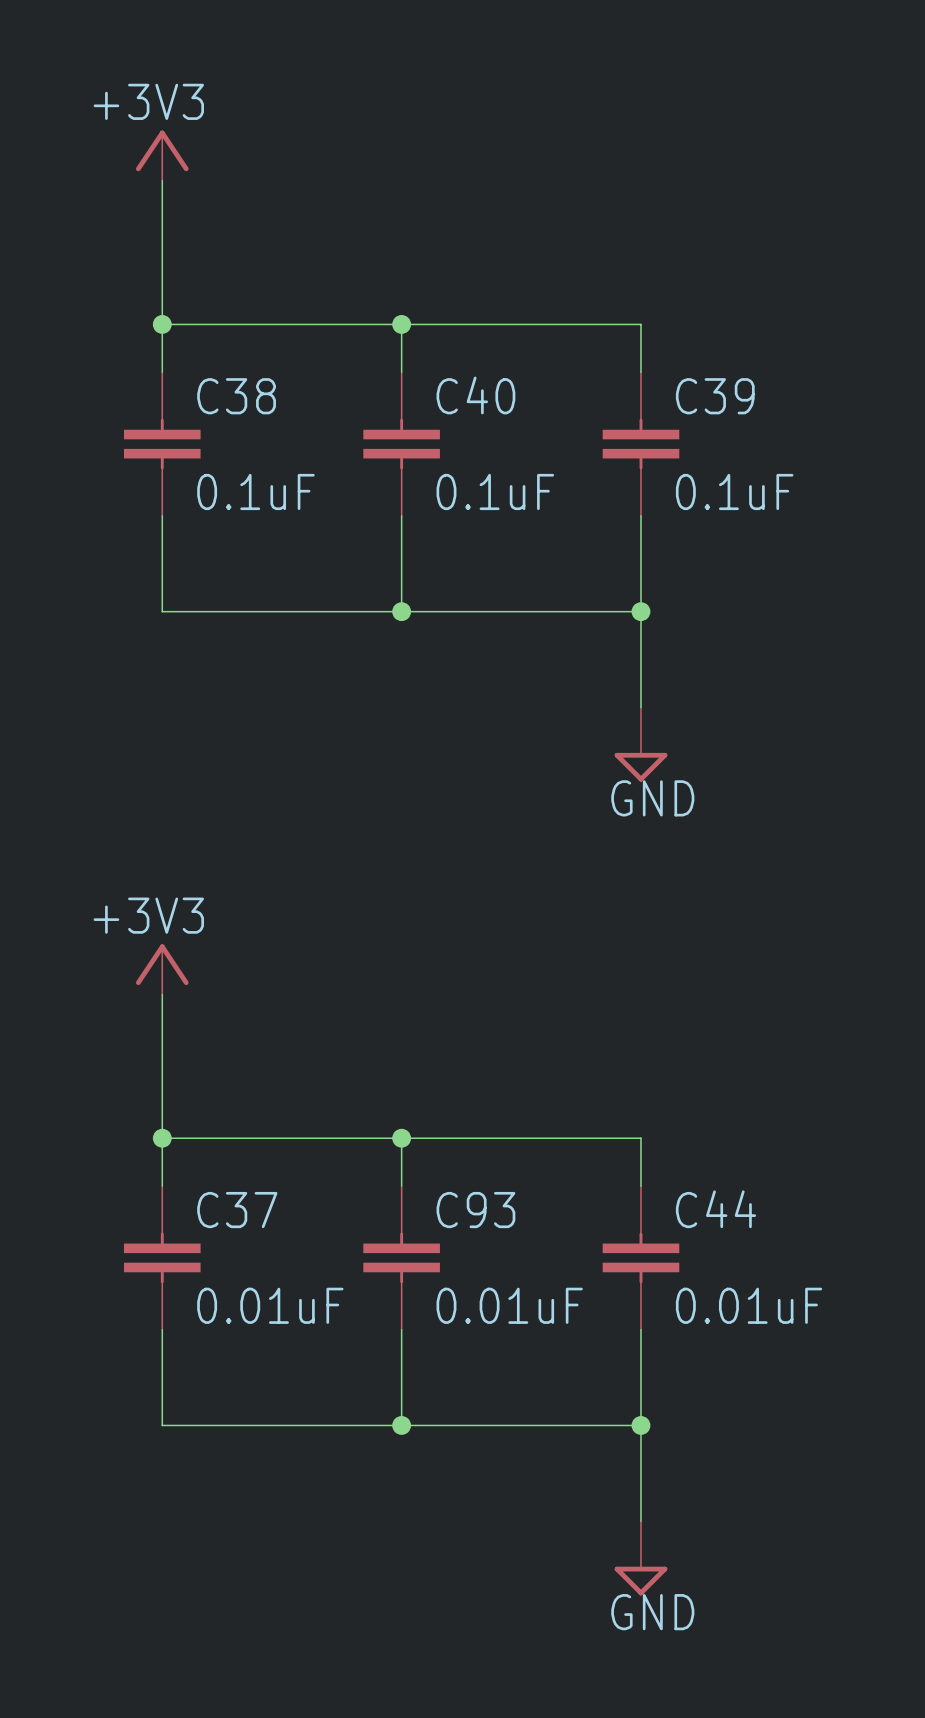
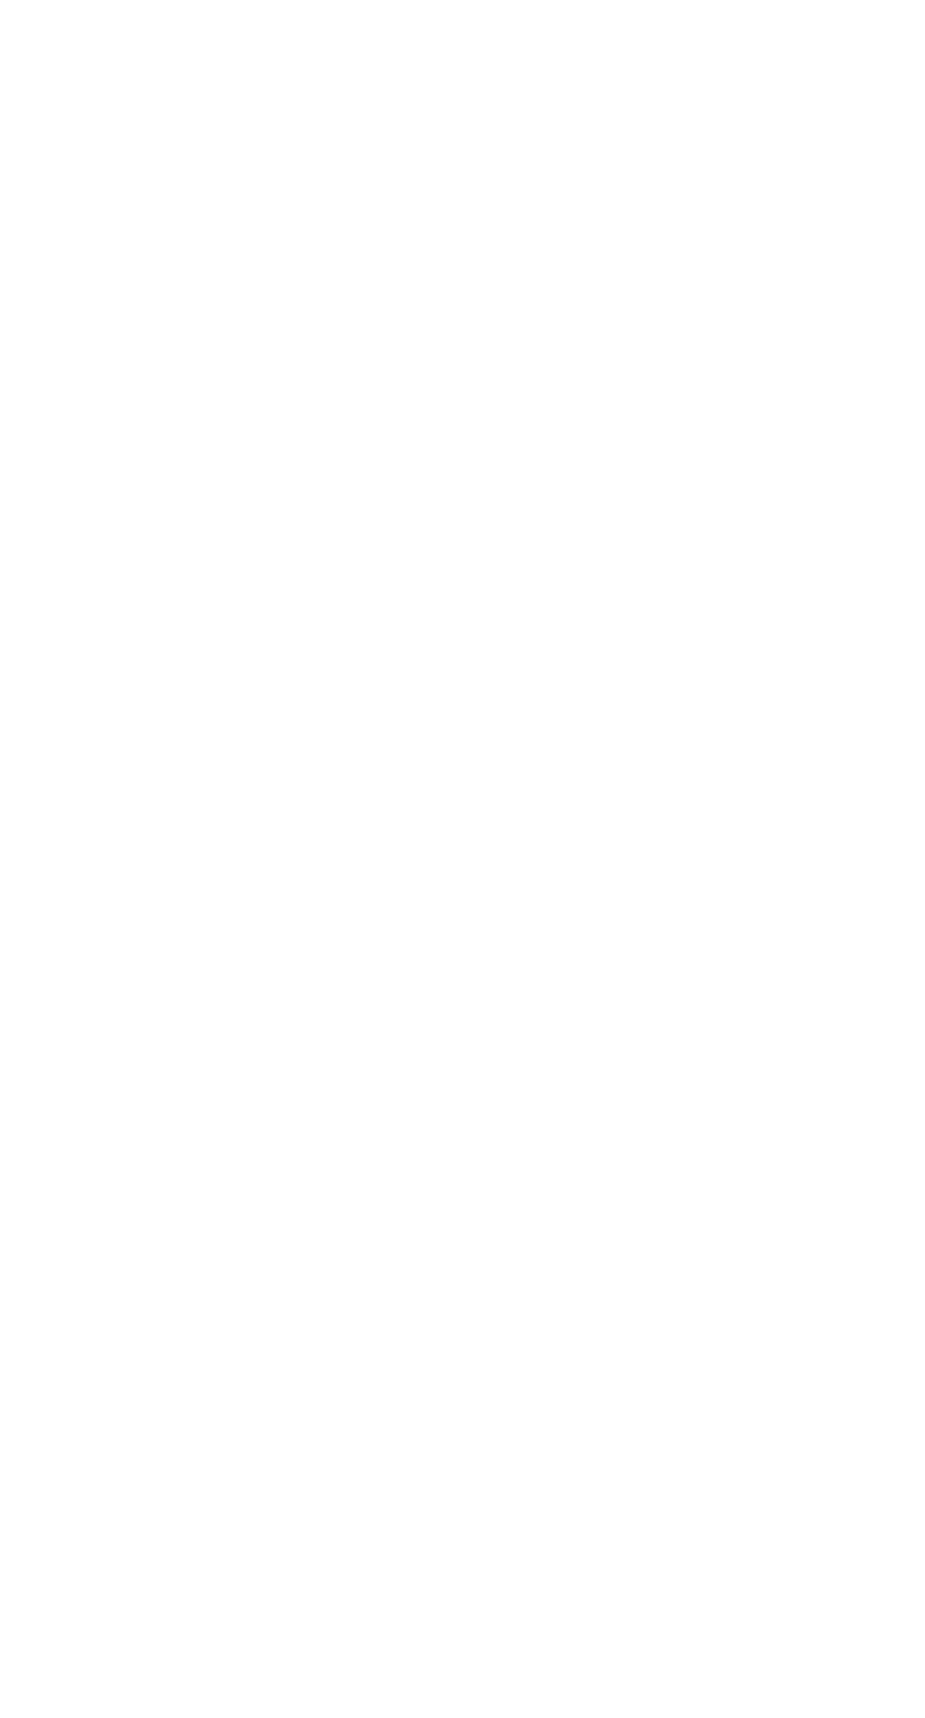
power symbol: +3V3 (162, 155) -> none
wire: (162, 180) (162, 372) -> none
wire: (162, 324) (640, 324) (640, 372) -> none
junction: (162, 324) -> none
wire: (401, 324) (401, 372) -> none
junction: (401, 324) -> none
C38: 0.1uF (162, 444) -> none
C40: 0.1uF (401, 444) -> none
C39: 0.1uF (640, 444) -> none
wire: (162, 515) (162, 611) (640, 611) -> none
wire: (401, 515) (401, 611) -> none
wire: (640, 515) (640, 707) -> none
junction: (401, 611) -> none
junction: (640, 611) -> none
power symbol: GND (640, 744) -> none
power symbol: +3V3 (162, 969) -> none
wire: (162, 994) (162, 1186) -> none
wire: (162, 1138) (640, 1138) (640, 1186) -> none
junction: (162, 1138) -> none
wire: (401, 1138) (401, 1186) -> none
junction: (401, 1138) -> none
C37: 0.01uF (162, 1257) -> none
C93: 0.01uF (401, 1257) -> none
C44: 0.01uF (640, 1257) -> none
wire: (162, 1329) (162, 1425) (640, 1425) -> none
wire: (401, 1329) (401, 1425) -> none
wire: (640, 1329) (640, 1521) -> none
junction: (401, 1425) -> none
junction: (640, 1425) -> none
power symbol: GND (640, 1558) -> none

